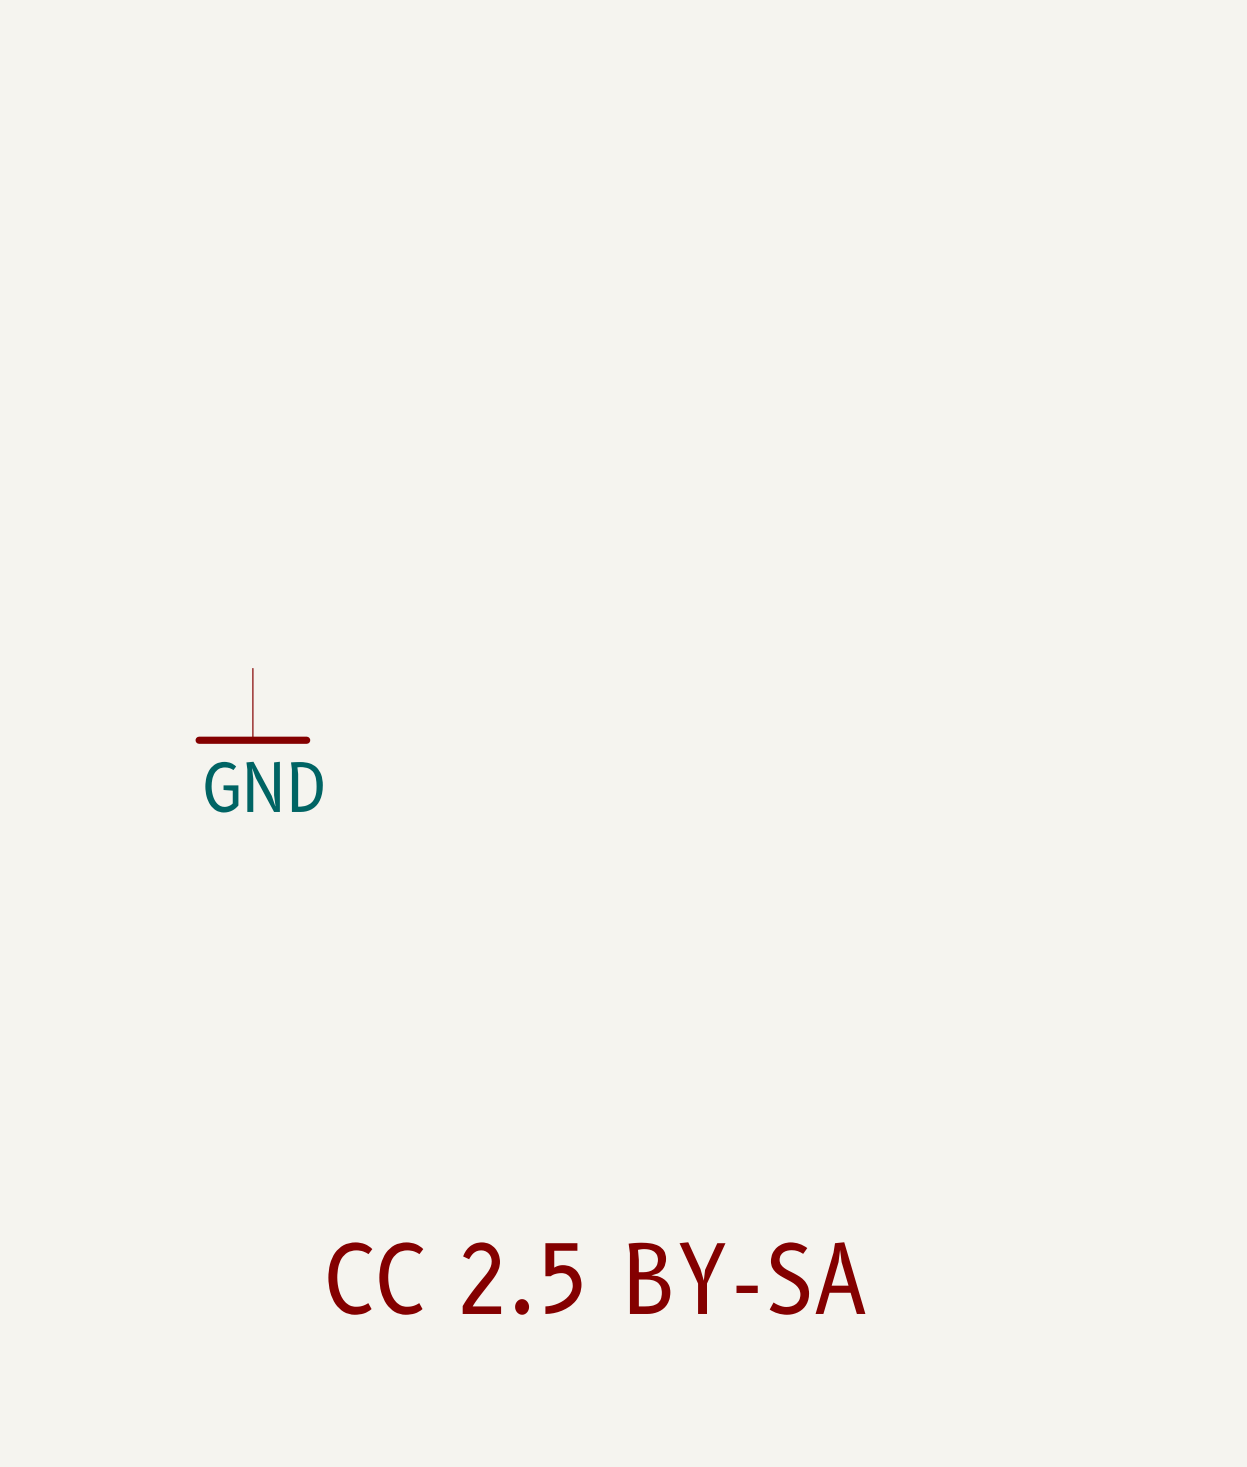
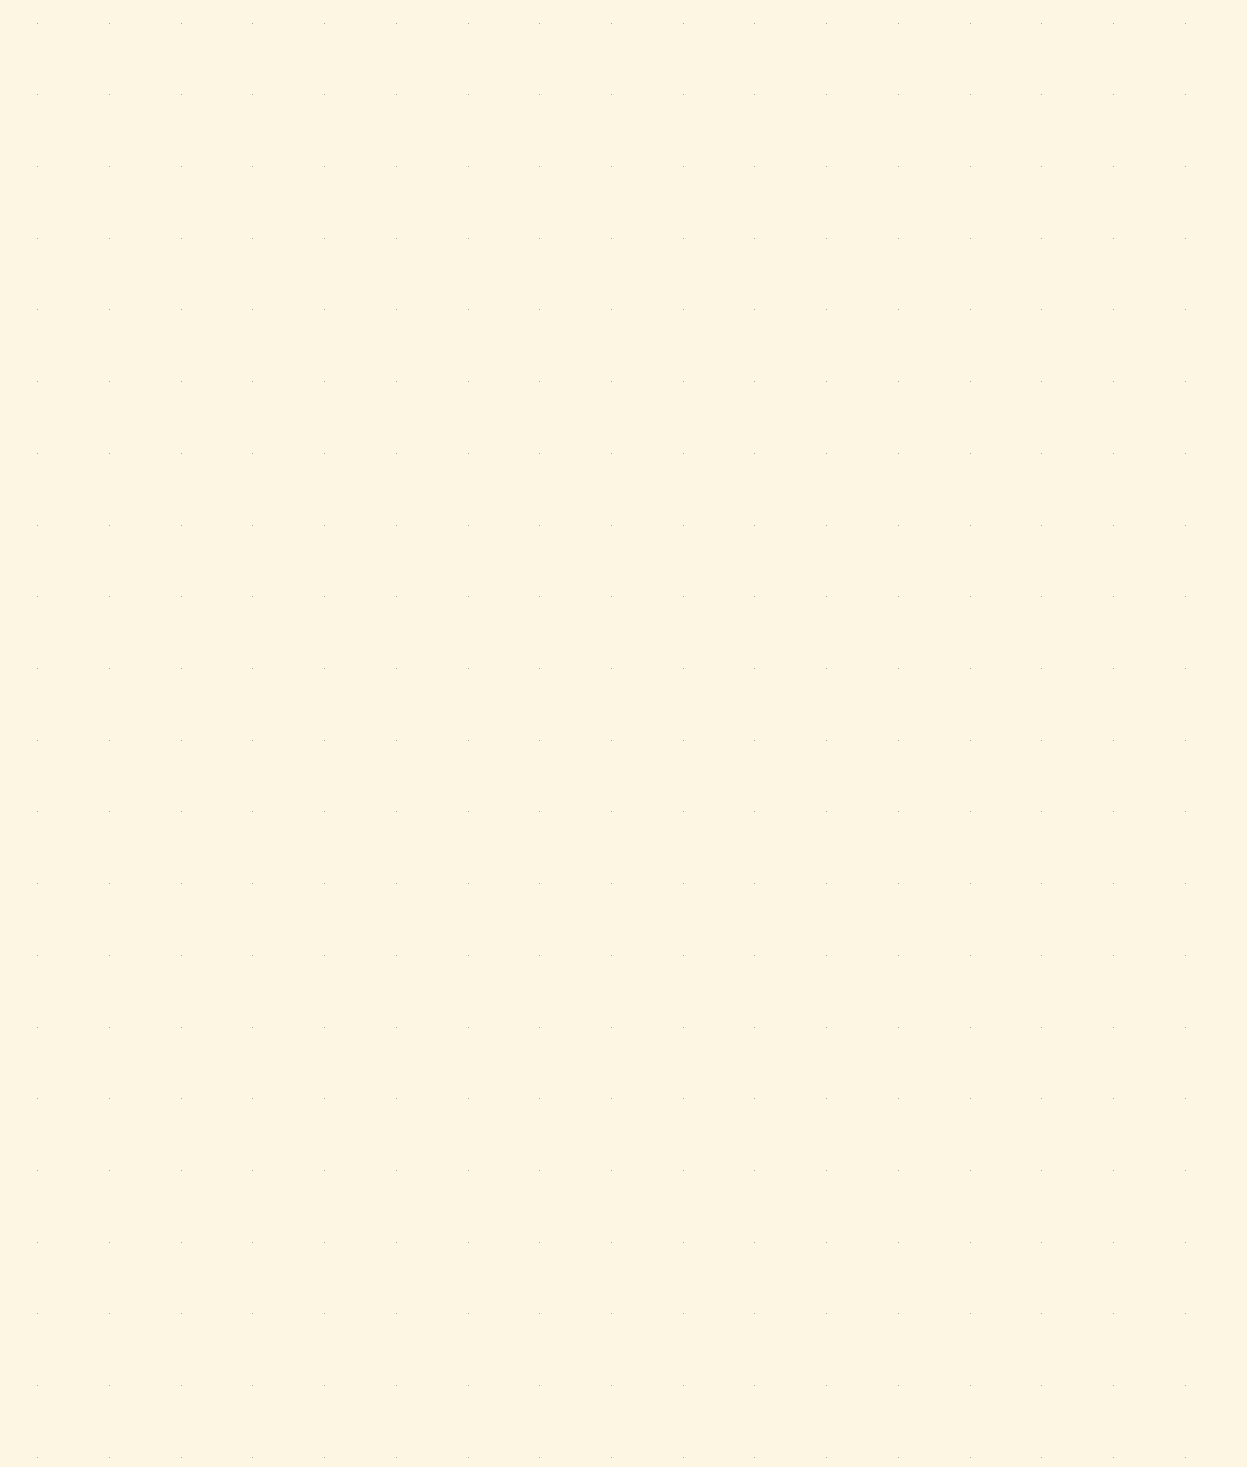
power symbol: GND (252, 706) -> none
text: CC 2.5 BY-SA (596, 1278) -> none

